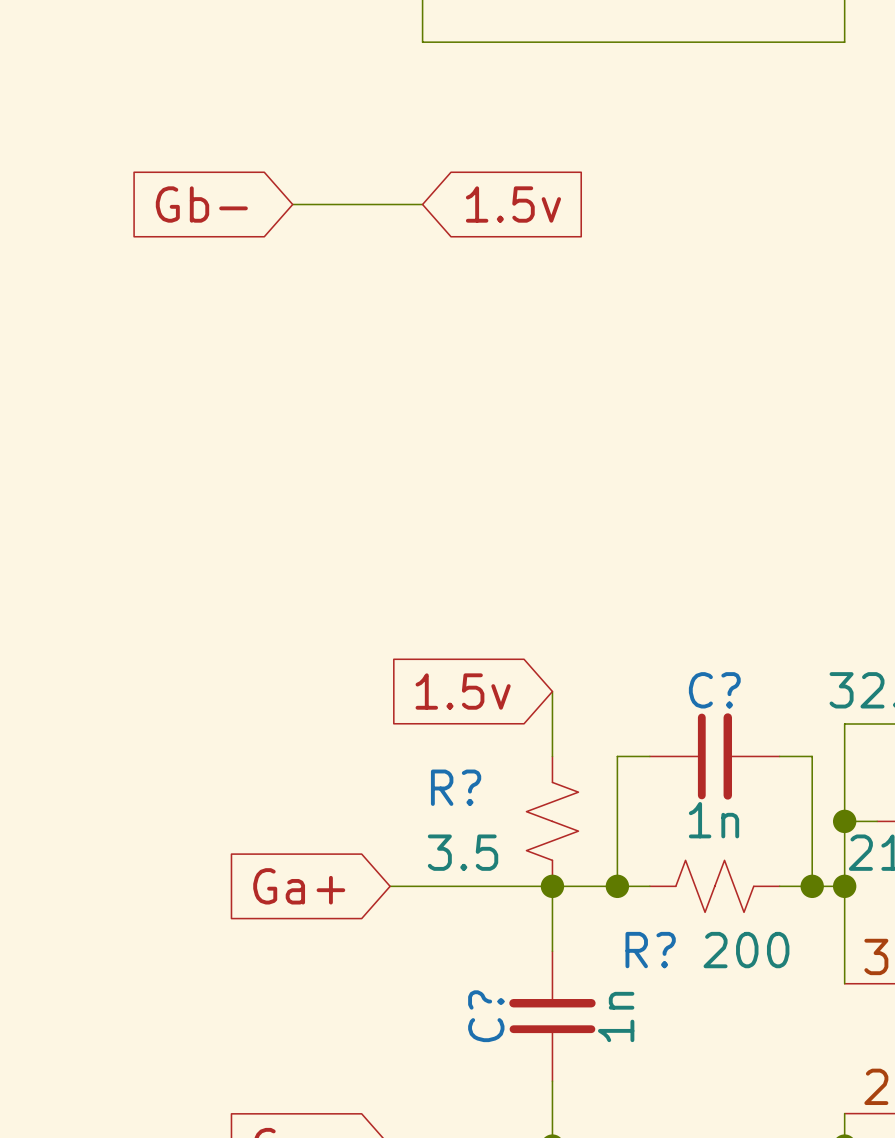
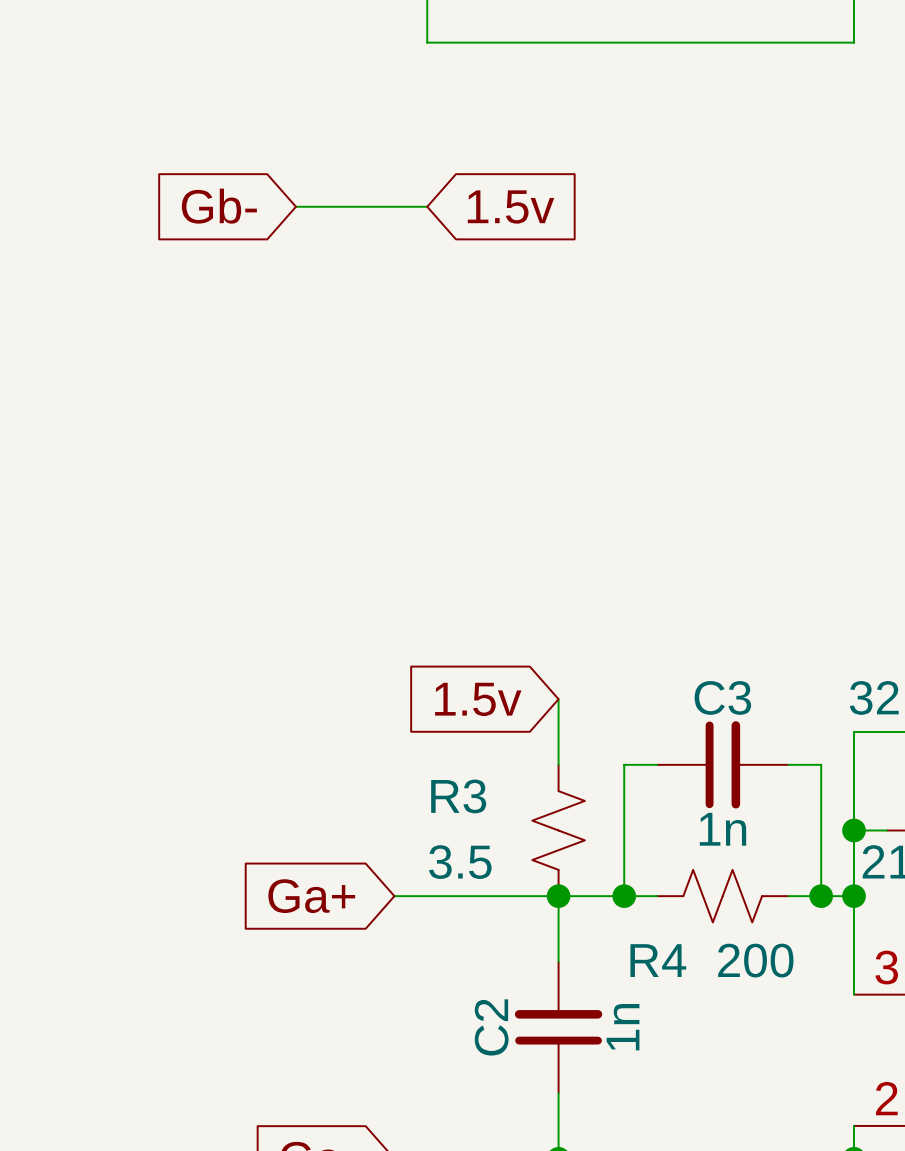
C? name: C? (714, 690) -> C3 (722, 697)
R? name: R? (456, 787) -> R3 (458, 796)
R? name: R? (650, 950) -> R4 (658, 960)
C? name: C? (486, 1016) -> C2 (491, 1027)

